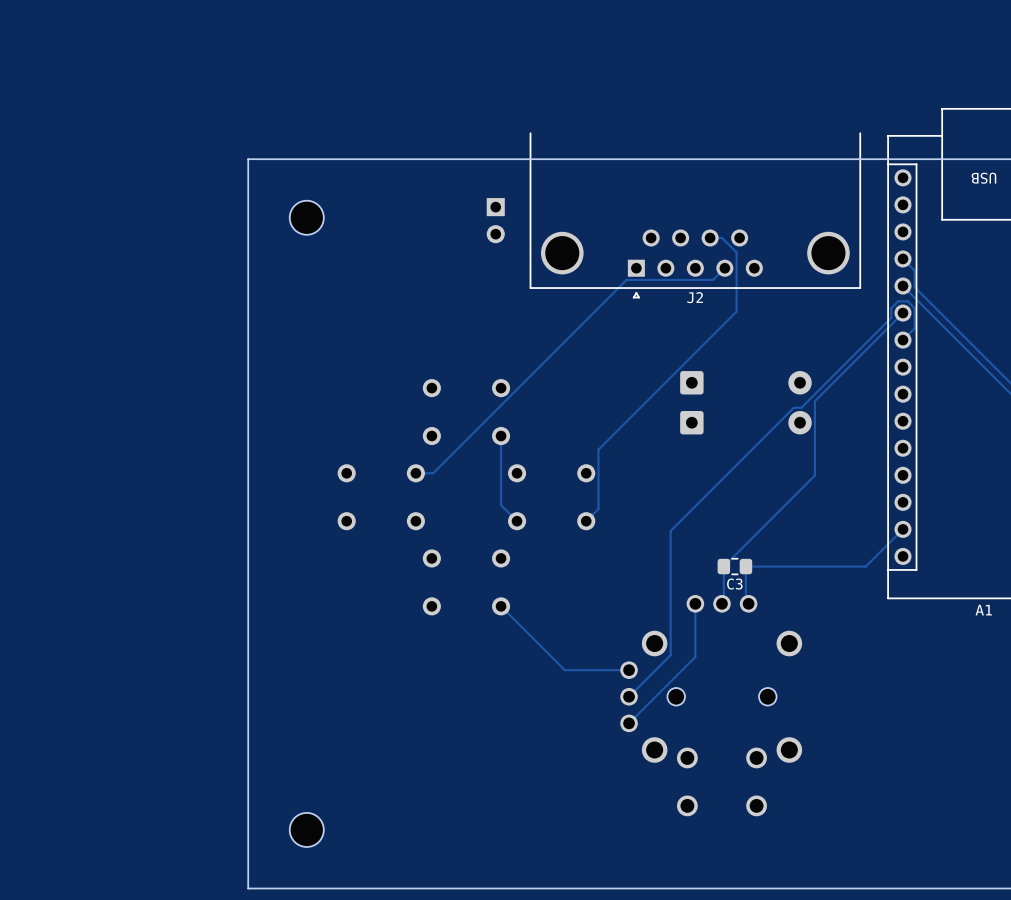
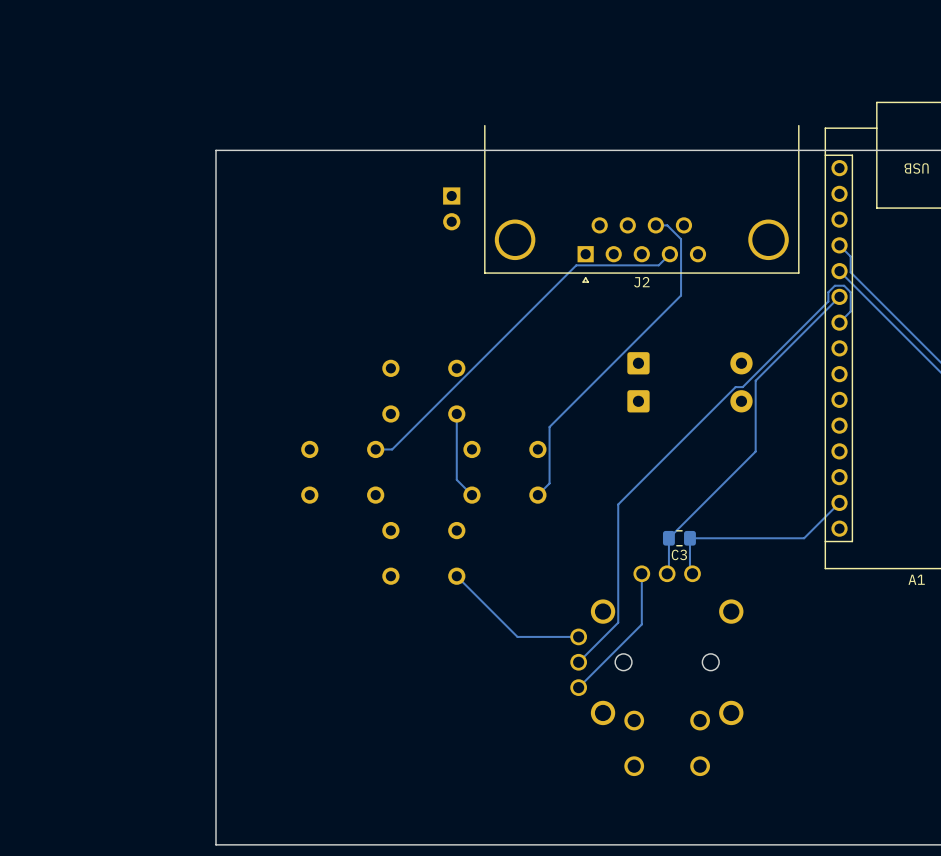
part: (306, 217) -> none
part: (306, 829) -> none

